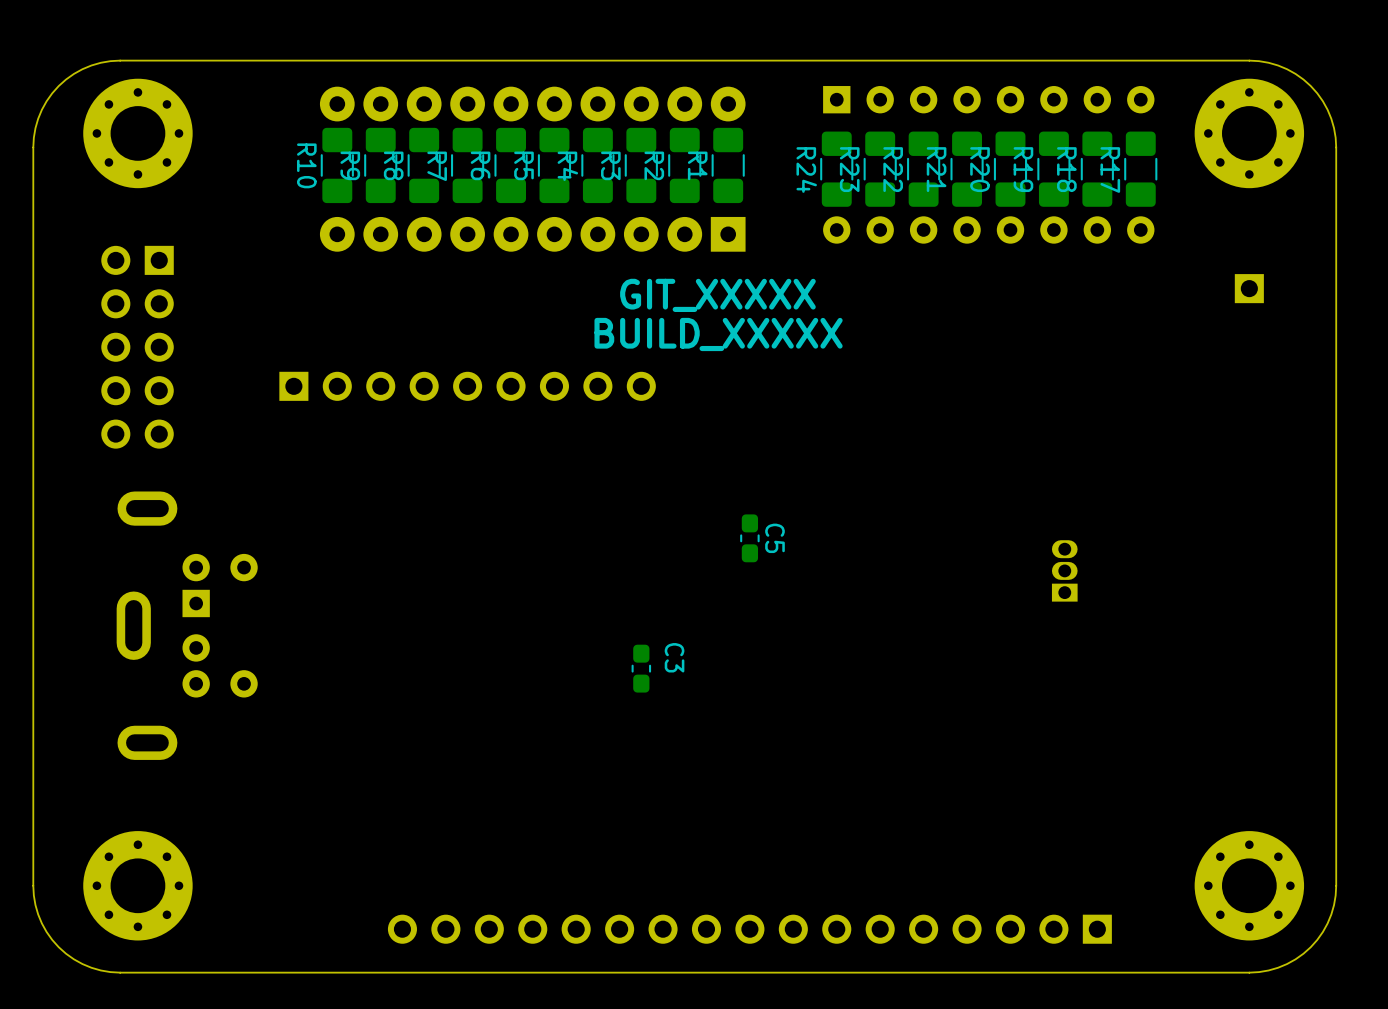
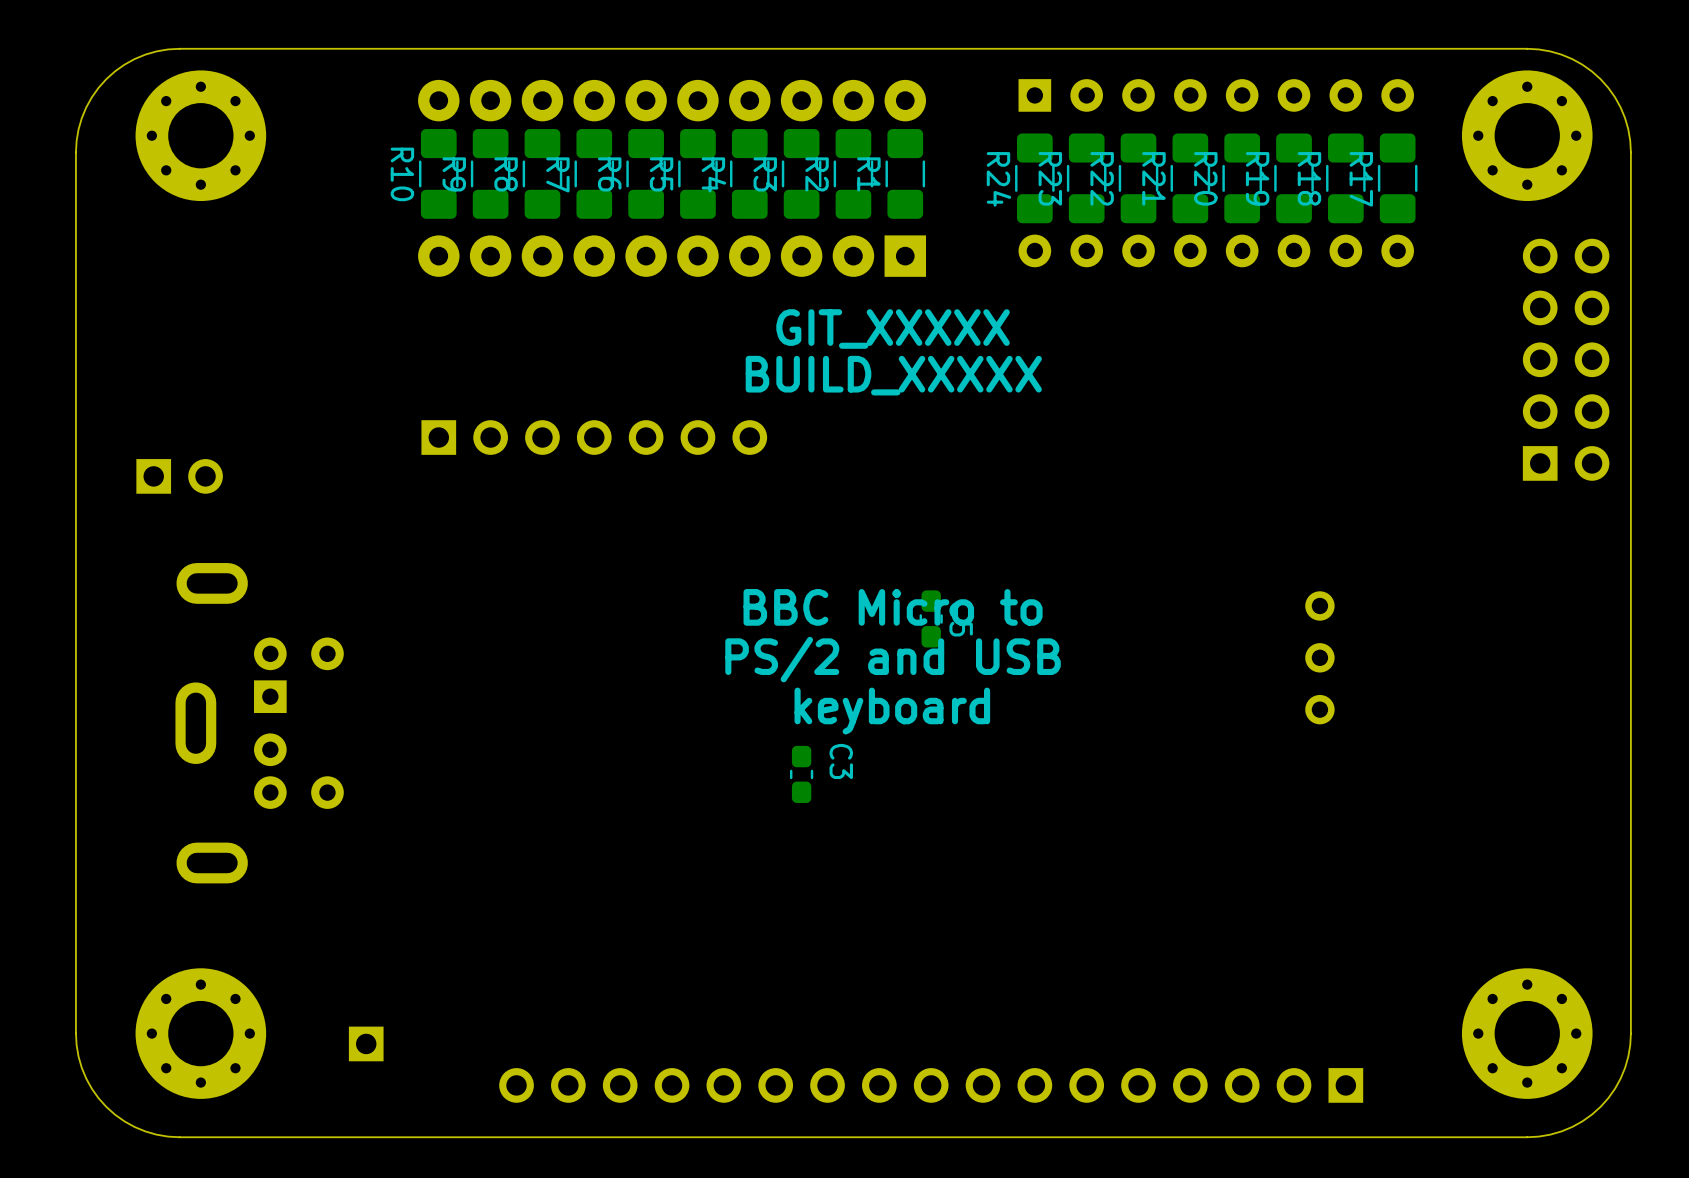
part: (1249, 288) -> none
part: none -> (1566, 359)
part: (137, 347) -> none
part footprint: [279, 371, 656, 401] -> [421, 420, 768, 455]
part: none -> (179, 476)
text: none -> BBC Micro to (893, 607)
part footprint: [1051, 540, 1078, 602] -> [1305, 591, 1335, 725]
text: none -> PS/2 and USB (893, 659)
text: none -> keyboard (892, 711)
part: none -> (366, 1043)

